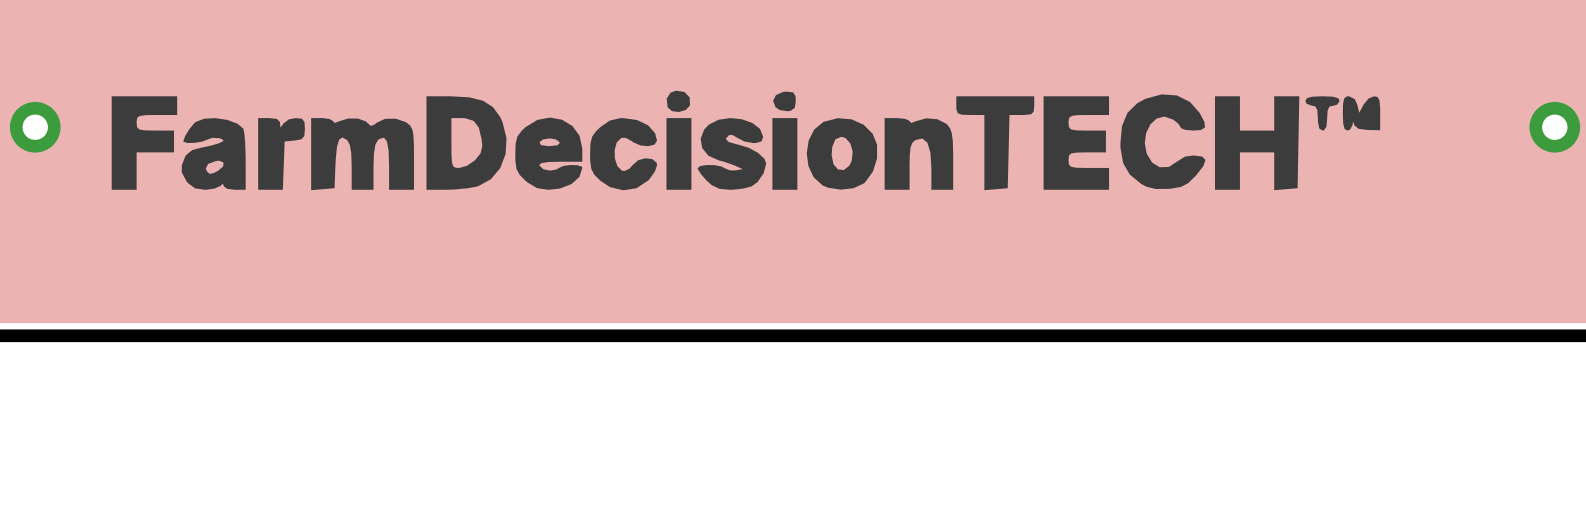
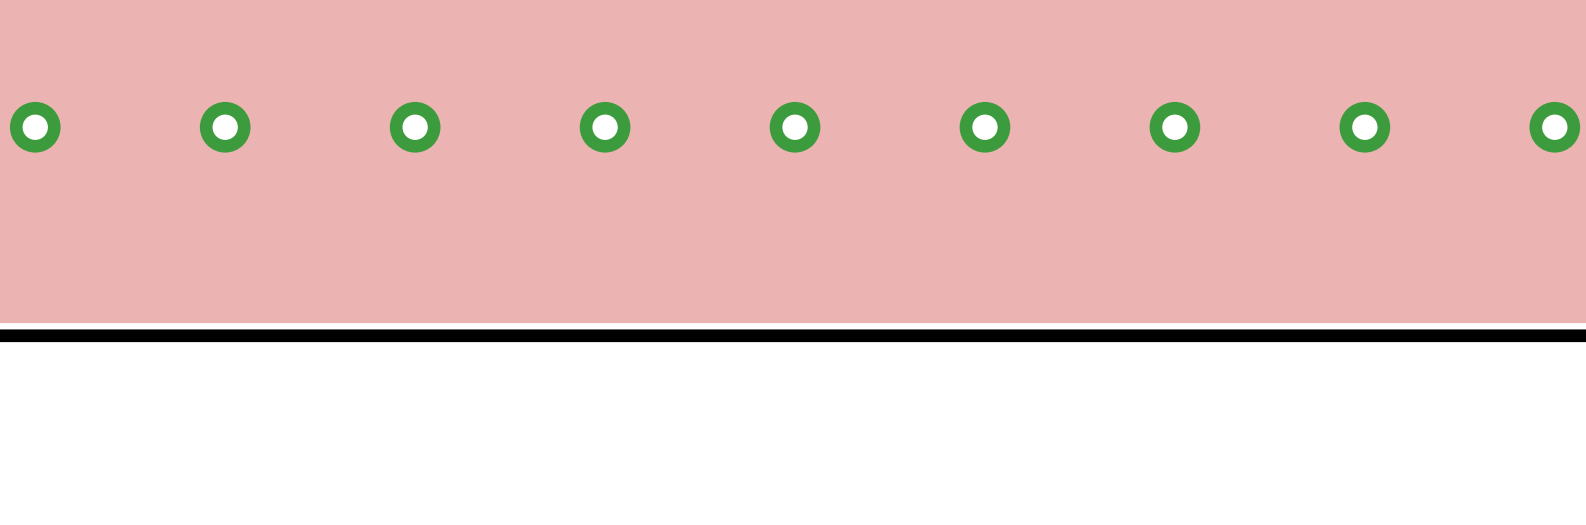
drawing: [111, 90, 1381, 191] -> none
via: none -> (225, 127)
via: none -> (415, 127)
via: none -> (605, 127)
via: none -> (795, 127)
via: none -> (984, 127)
via: none -> (1174, 127)
via: none -> (1364, 127)

